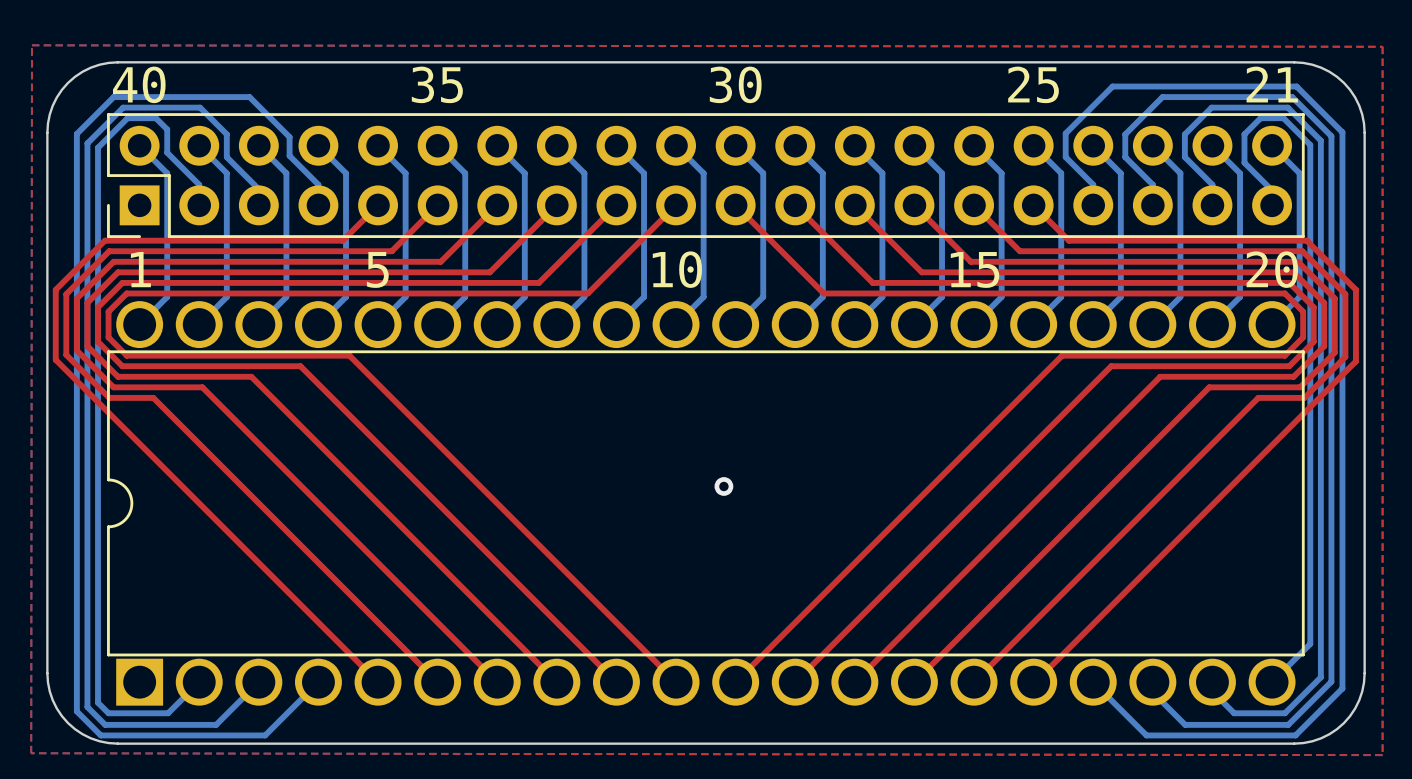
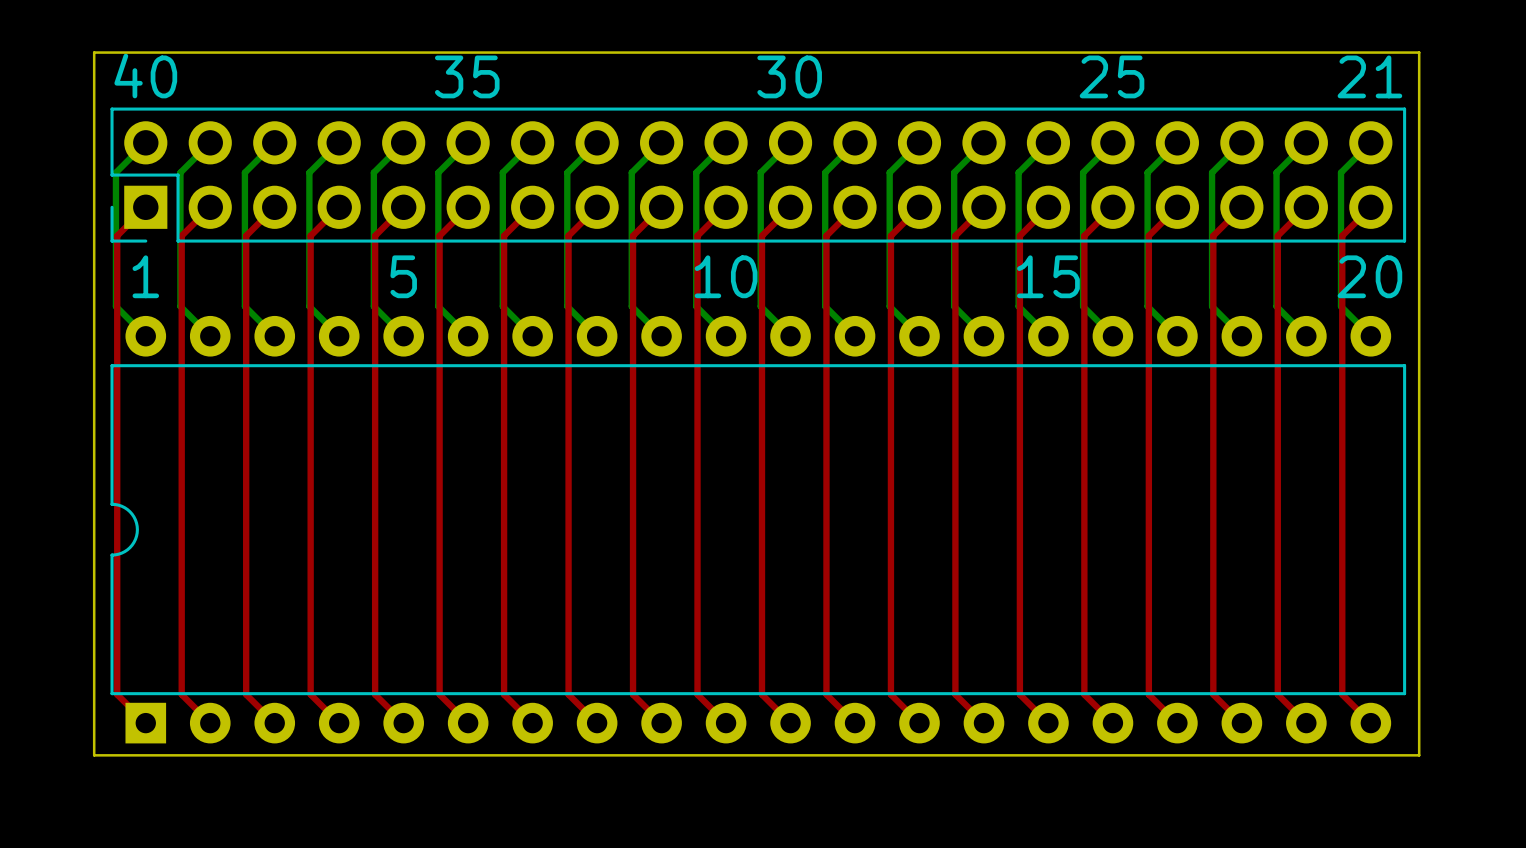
top zone outline: (31, 45) (1382, 46) (1382, 755) (31, 753) (31, 45) -> none
board edge: (117, 62) (90, 67) (68, 82) (52, 105) (47, 132) (47, 682) (56, 708) (74, 729) (90, 738) (117, 743) (1294, 743) (1312, 741) (1329, 734) (1344, 723) (1355, 708) (1362, 691) (1364, 673) (1364, 132) (1359, 105) (1344, 82) (1321, 67) (1294, 62) -> (122, 52) (94, 52) (94, 755) (1419, 755) (1419, 52) (1394, 52)
bottom track: (139, 145) (167, 173) (167, 297) (139, 324) -> (145, 142) (115, 172) (115, 306) (145, 336)
bottom track: (199, 145) (226, 173) (226, 297) (199, 324) -> (210, 142) (180, 172) (180, 306) (210, 336)
bottom track: (258, 145) (286, 173) (286, 297) (258, 324) -> (274, 142) (244, 172) (244, 306) (274, 336)
bottom track: (318, 145) (346, 173) (346, 297) (318, 324) -> (339, 142) (309, 172) (309, 306) (339, 336)
bottom track: (378, 145) (405, 173) (405, 297) (378, 324) -> (403, 142) (373, 172) (373, 306) (403, 336)
bottom track: (437, 145) (465, 173) (465, 297) (437, 324) -> (468, 142) (438, 172) (438, 306) (468, 336)
bottom track: (497, 145) (524, 173) (524, 297) (497, 324) -> (532, 142) (502, 172) (502, 306) (532, 336)
bottom track: (556, 145) (584, 173) (584, 297) (556, 324) -> (597, 142) (567, 172) (567, 306) (597, 336)
bottom track: (616, 145) (644, 173) (644, 297) (616, 324) -> (661, 142) (631, 172) (631, 306) (661, 336)
bottom track: (676, 145) (703, 173) (703, 297) (676, 324) -> (726, 142) (696, 172) (696, 306) (726, 336)
bottom track: (735, 145) (763, 173) (763, 297) (735, 324) -> (790, 142) (760, 172) (760, 306) (790, 336)
bottom track: (795, 145) (822, 173) (822, 297) (795, 324) -> (855, 142) (825, 172) (825, 306) (855, 336)
bottom track: (854, 145) (882, 173) (882, 297) (854, 324) -> (919, 142) (889, 172) (889, 306) (919, 336)
bottom track: (914, 145) (942, 173) (942, 297) (914, 324) -> (983, 142) (954, 172) (954, 306) (983, 336)
bottom track: (974, 145) (1001, 173) (1001, 297) (974, 324) -> (1048, 142) (1018, 172) (1018, 306) (1048, 336)
bottom track: (1033, 145) (1061, 173) (1061, 297) (1033, 324) -> (1112, 142) (1083, 172) (1083, 306) (1112, 336)
bottom track: (1093, 145) (1120, 173) (1120, 297) (1093, 324) -> (1177, 142) (1147, 172) (1147, 306) (1177, 336)
bottom track: (1152, 145) (1180, 173) (1180, 297) (1152, 324) -> (1241, 142) (1212, 172) (1212, 306) (1241, 336)
bottom track: (1212, 145) (1240, 173) (1240, 297) (1212, 324) -> (1306, 142) (1276, 172) (1276, 306) (1306, 336)
bottom track: (1272, 145) (1299, 173) (1299, 297) (1272, 324) -> (1370, 142) (1341, 172) (1341, 306) (1370, 336)
top track: none -> (145, 207) (117, 235) (117, 694) (145, 723)
bottom track: (199, 205) (199, 184) (167, 152) (167, 129) (155, 118) (127, 118) (97, 147) (97, 702) (108, 713) (168, 713) (199, 682) -> none
top track: none -> (210, 207) (181, 235) (181, 694) (210, 723)
bottom track: (258, 205) (258, 189) (226, 157) (226, 134) (200, 107) (123, 107) (87, 143) (87, 707) (105, 724) (216, 724) (258, 682) -> none
top track: none -> (274, 207) (246, 235) (246, 694) (274, 723)
bottom track: (318, 205) (318, 184) (289, 155) (289, 137) (249, 97) (113, 97) (76, 133) (76, 711) (100, 735) (265, 735) (318, 682) -> none
top track: none -> (339, 207) (310, 235) (310, 694) (339, 723)
top track: (735, 205) (823, 293) (1284, 293) (1303, 311) (1303, 337) (1284, 355) (1062, 355) (735, 682) -> (790, 207) (761, 235) (761, 694) (790, 723)
top track: (795, 205) (872, 282) (1289, 282) (1313, 307) (1313, 341) (1289, 366) (1111, 366) (795, 682) -> (855, 207) (826, 235) (826, 694) (855, 723)
top track: (854, 205) (921, 272) (1293, 272) (1324, 302) (1324, 346) (1293, 376) (1160, 376) (854, 682) -> (919, 207) (890, 235) (890, 694) (919, 723)
top track: (914, 205) (970, 261) (1298, 261) (1334, 298) (1334, 352) (1300, 387) (1209, 387) (914, 682) -> (983, 207) (955, 235) (955, 694) (983, 723)
top track: (974, 205) (1019, 251) (1302, 251) (1345, 294) (1345, 356) (1304, 397) (1258, 397) (974, 682) -> (1048, 207) (1019, 235) (1019, 694) (1048, 723)
top track: (1033, 205) (1068, 240) (1306, 240) (1355, 289) (1355, 361) (1033, 682) -> (1112, 207) (1084, 235) (1084, 694) (1112, 723)
bottom track: (1093, 205) (1093, 184) (1065, 157) (1065, 133) (1112, 86) (1296, 86) (1342, 132) (1342, 688) (1295, 735) (1146, 735) (1093, 682) -> none
top track: none -> (1177, 207) (1148, 235) (1148, 694) (1177, 723)
bottom track: (1152, 205) (1152, 184) (1125, 157) (1125, 134) (1162, 97) (1292, 97) (1331, 136) (1331, 681) (1288, 724) (1185, 724) (1152, 692) -> none
top track: none -> (1241, 207) (1213, 235) (1213, 694) (1241, 723)
bottom track: (1212, 205) (1212, 184) (1184, 157) (1184, 134) (1211, 107) (1287, 107) (1320, 140) (1320, 677) (1284, 713) (1234, 713) (1212, 691) -> none
top track: none -> (1306, 207) (1277, 235) (1277, 694) (1306, 723)
bottom track: (1272, 205) (1272, 190) (1244, 162) (1244, 134) (1260, 118) (1283, 118) (1310, 145) (1310, 643) (1272, 682) -> none
top track: none -> (1370, 207) (1342, 235) (1342, 694) (1370, 723)
top track: (351, 231) (342, 240) (104, 240) (55, 289) (55, 359) (351, 655) -> (375, 235) (375, 694)
top track: (411, 231) (391, 251) (109, 251) (66, 294) (66, 354) (109, 397) (153, 397) (411, 655) -> (439, 235) (439, 694)
top track: (470, 231) (440, 261) (113, 261) (76, 298) (76, 350) (113, 387) (202, 387) (470, 655) -> (504, 235) (504, 694)
top track: (530, 231) (489, 272) (118, 272) (87, 302) (87, 346) (118, 376) (251, 376) (530, 655) -> (568, 235) (568, 694)
top track: (590, 231) (538, 282) (122, 282) (97, 307) (97, 341) (122, 366) (300, 366) (590, 655) -> (633, 235) (633, 694)
top track: (649, 231) (587, 293) (126, 293) (108, 311) (108, 337) (126, 355) (349, 355) (649, 655) -> (697, 235) (697, 694)
part footprint: [107, 301, 1305, 706] -> [110, 315, 1407, 744]
via: (723, 486) -> none

